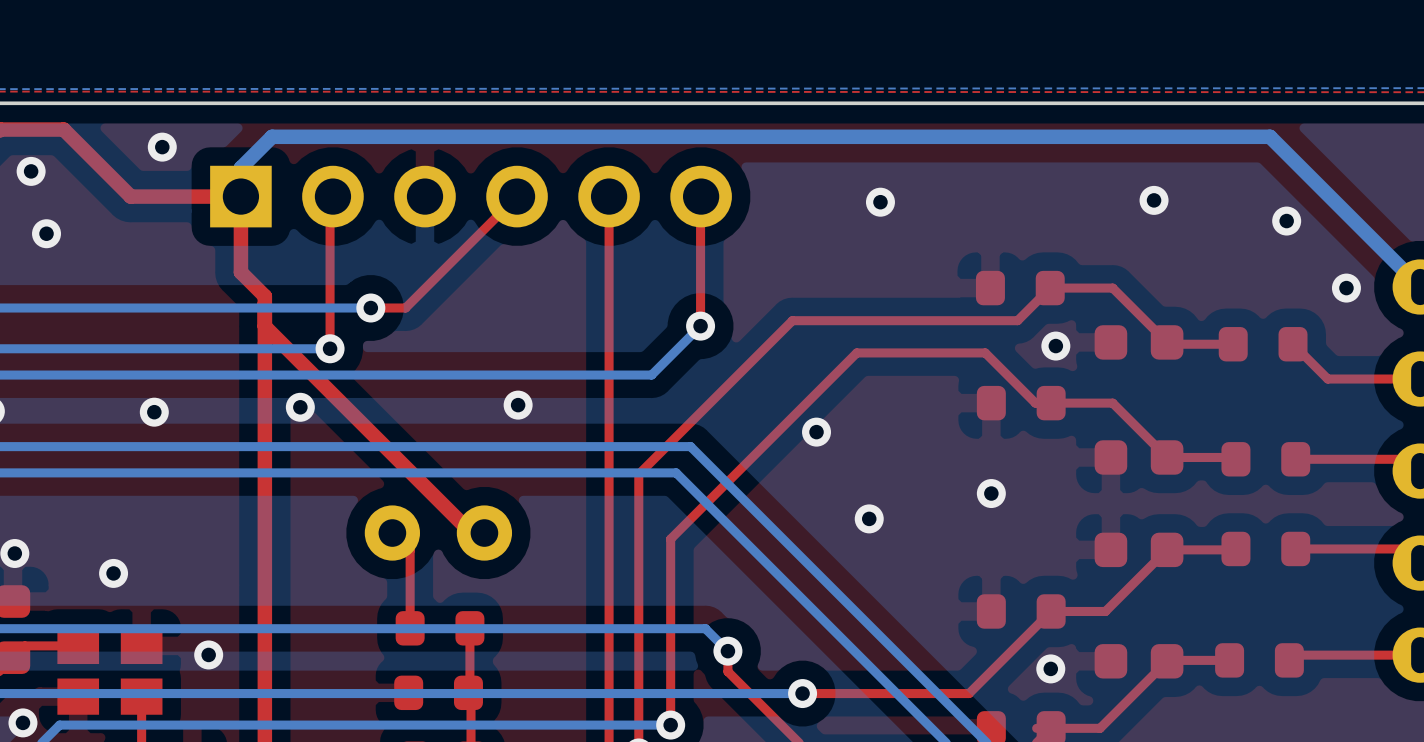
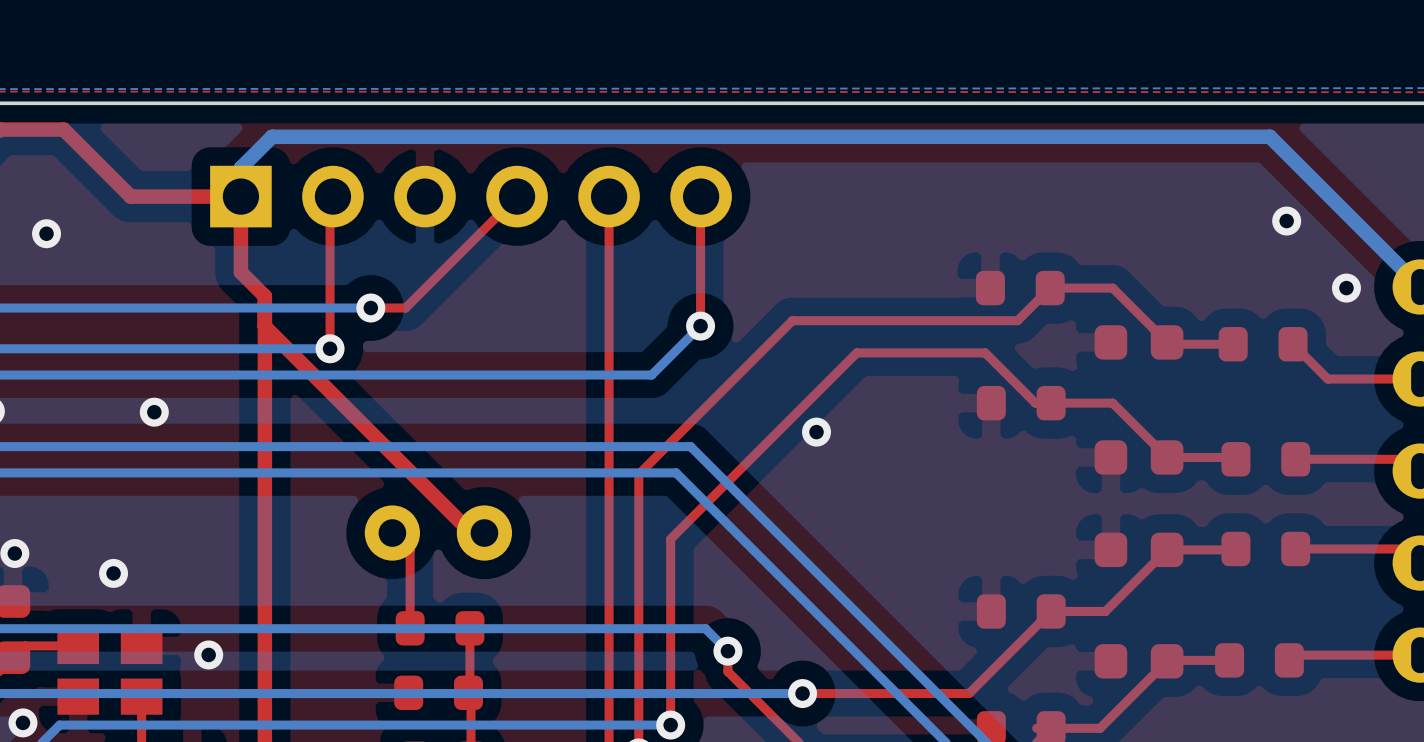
via: (162, 147) -> none
via: (31, 171) -> none
via: (1154, 200) -> none
via: (880, 202) -> none
via: (1055, 346) -> none
via: (518, 405) -> none
via: (300, 407) -> none
via: (991, 493) -> none
via: (869, 518) -> none
via: (1050, 668) -> none

